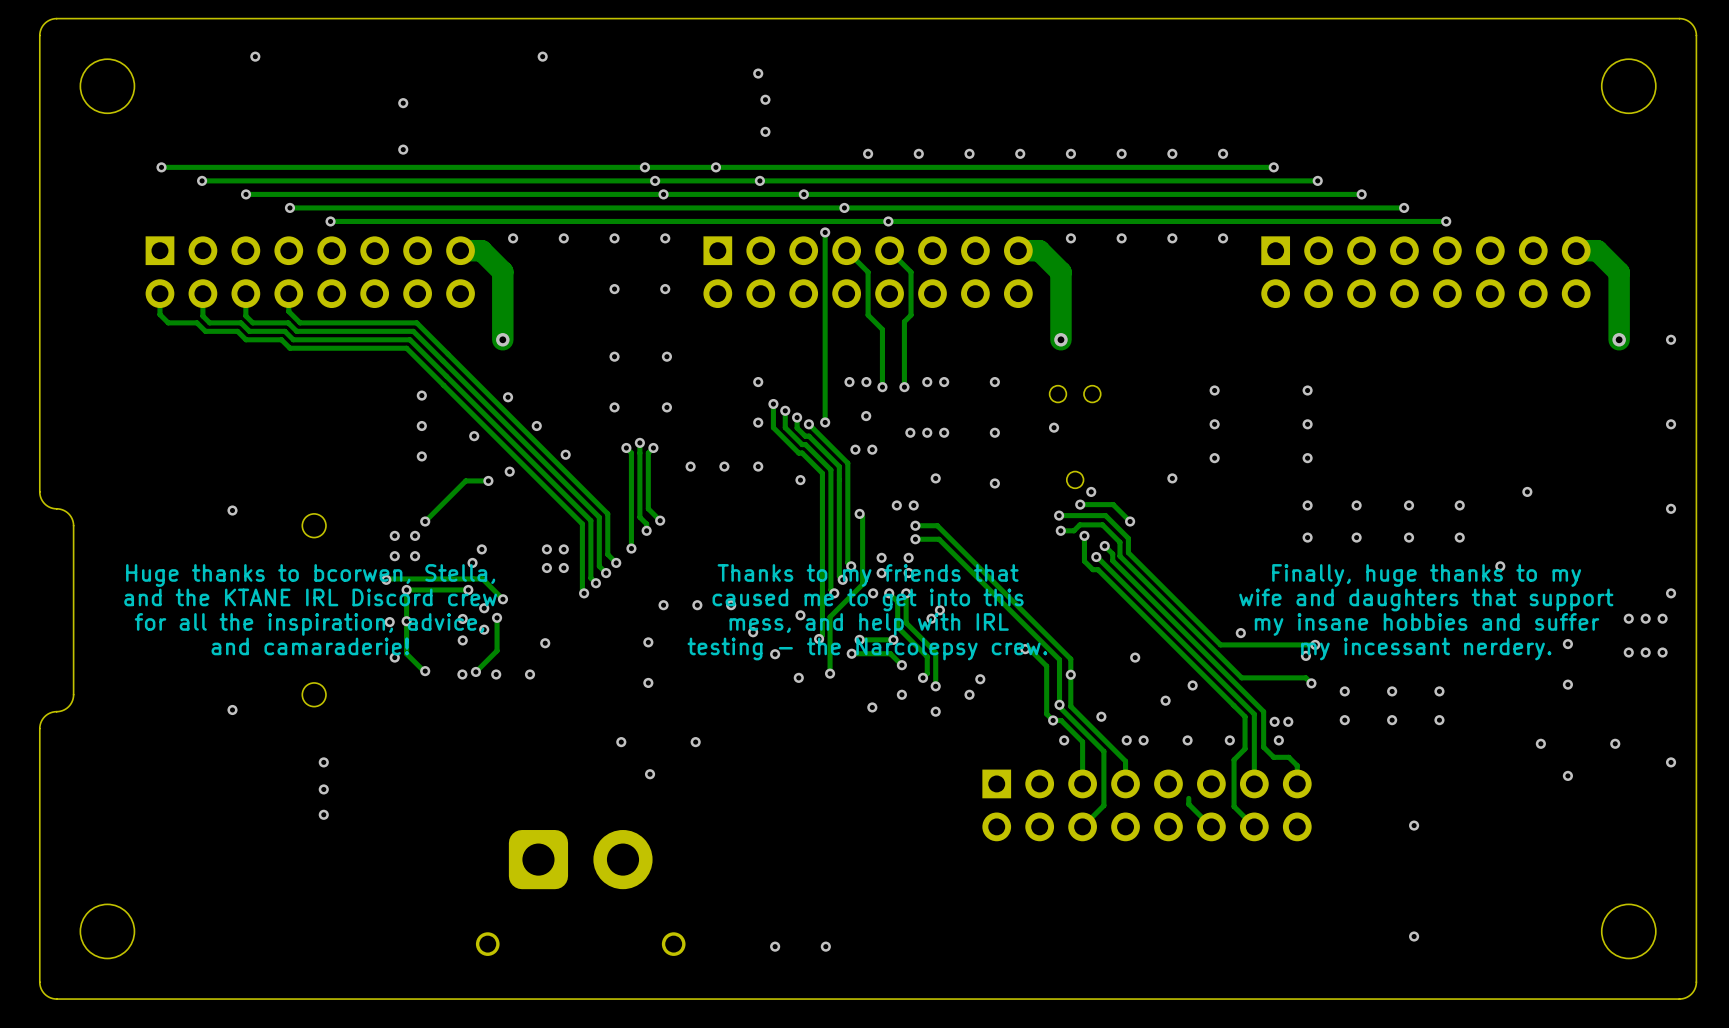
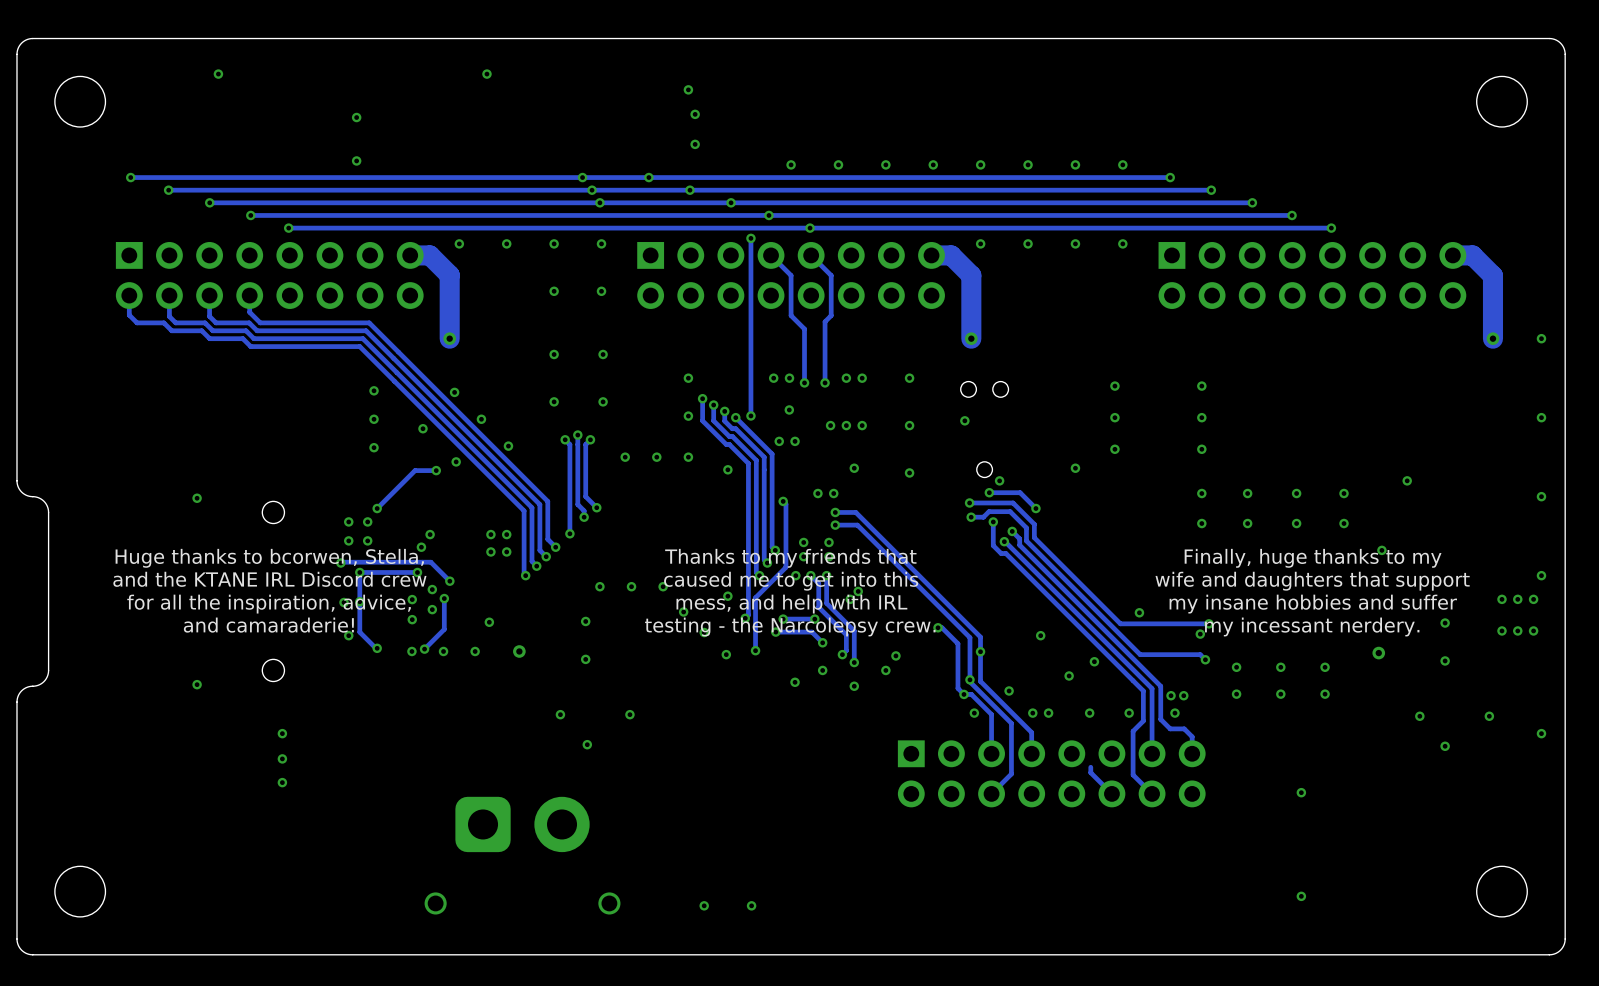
via: none -> (519, 651)
via: none -> (1378, 653)

